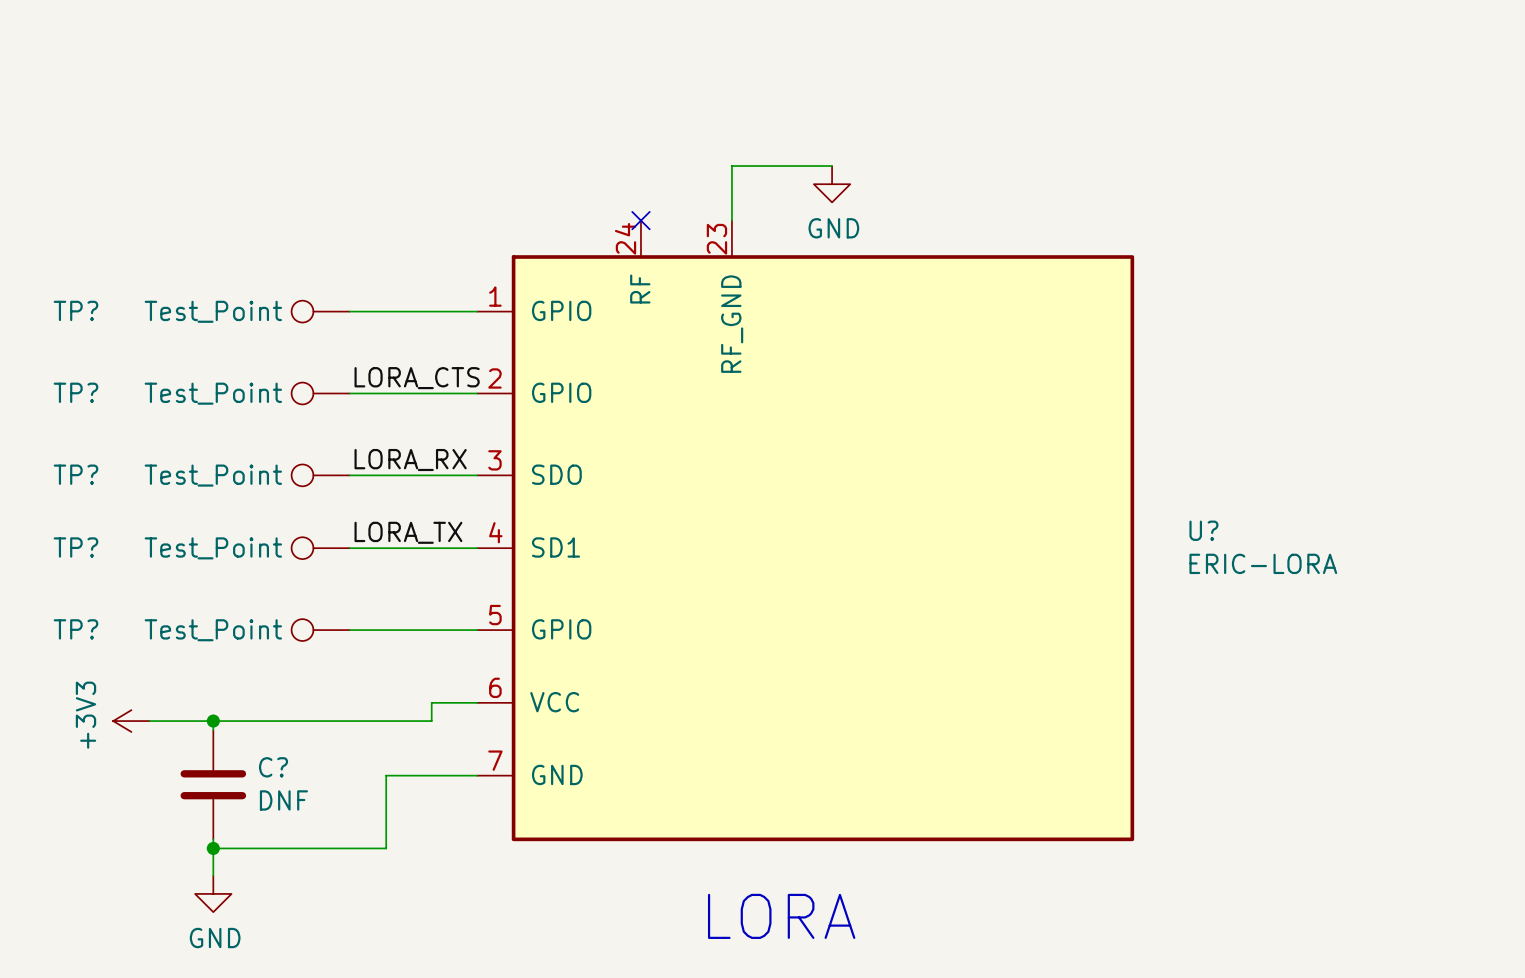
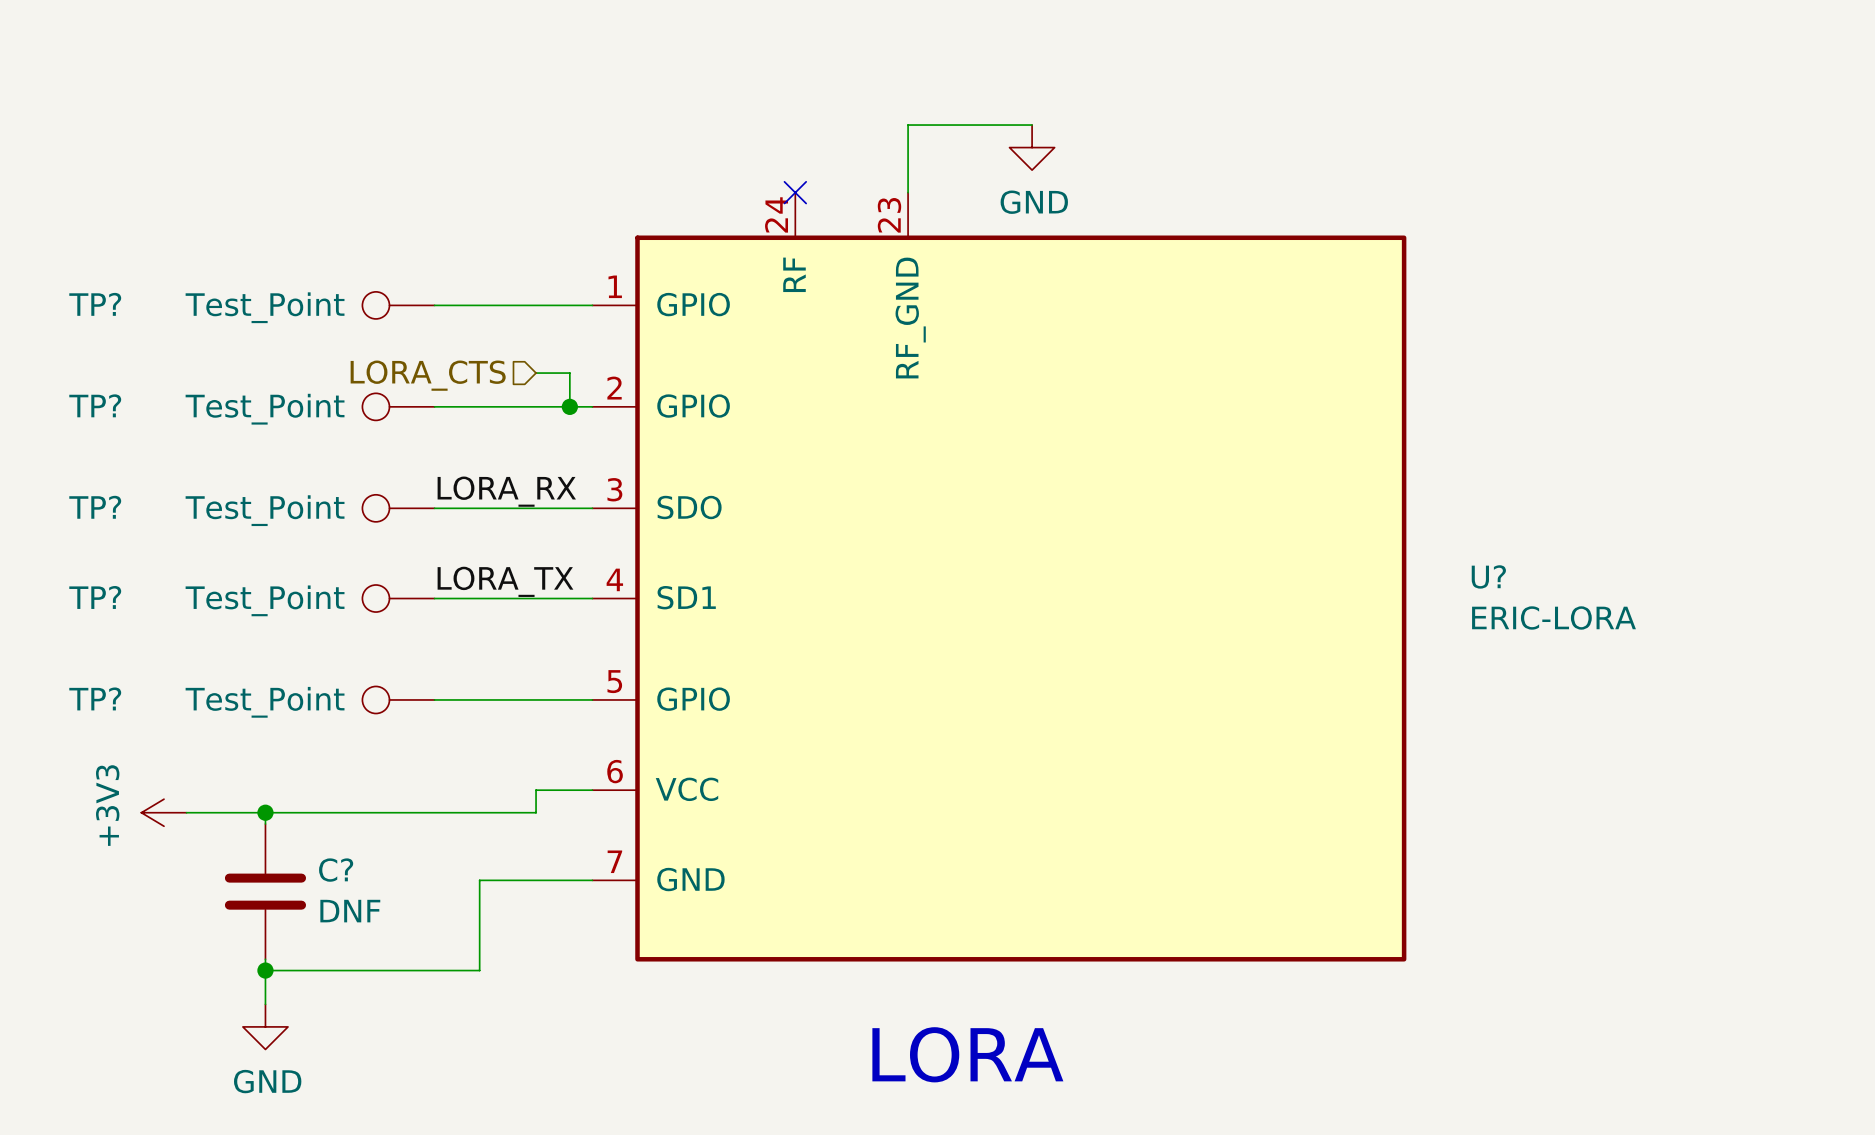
hierarchical label: none -> LORA_CTS (428, 375)
wire: none -> (536, 373) (569, 373) (569, 406)
label: LORA_CTS (417, 378) -> none
junction: none -> (569, 406)

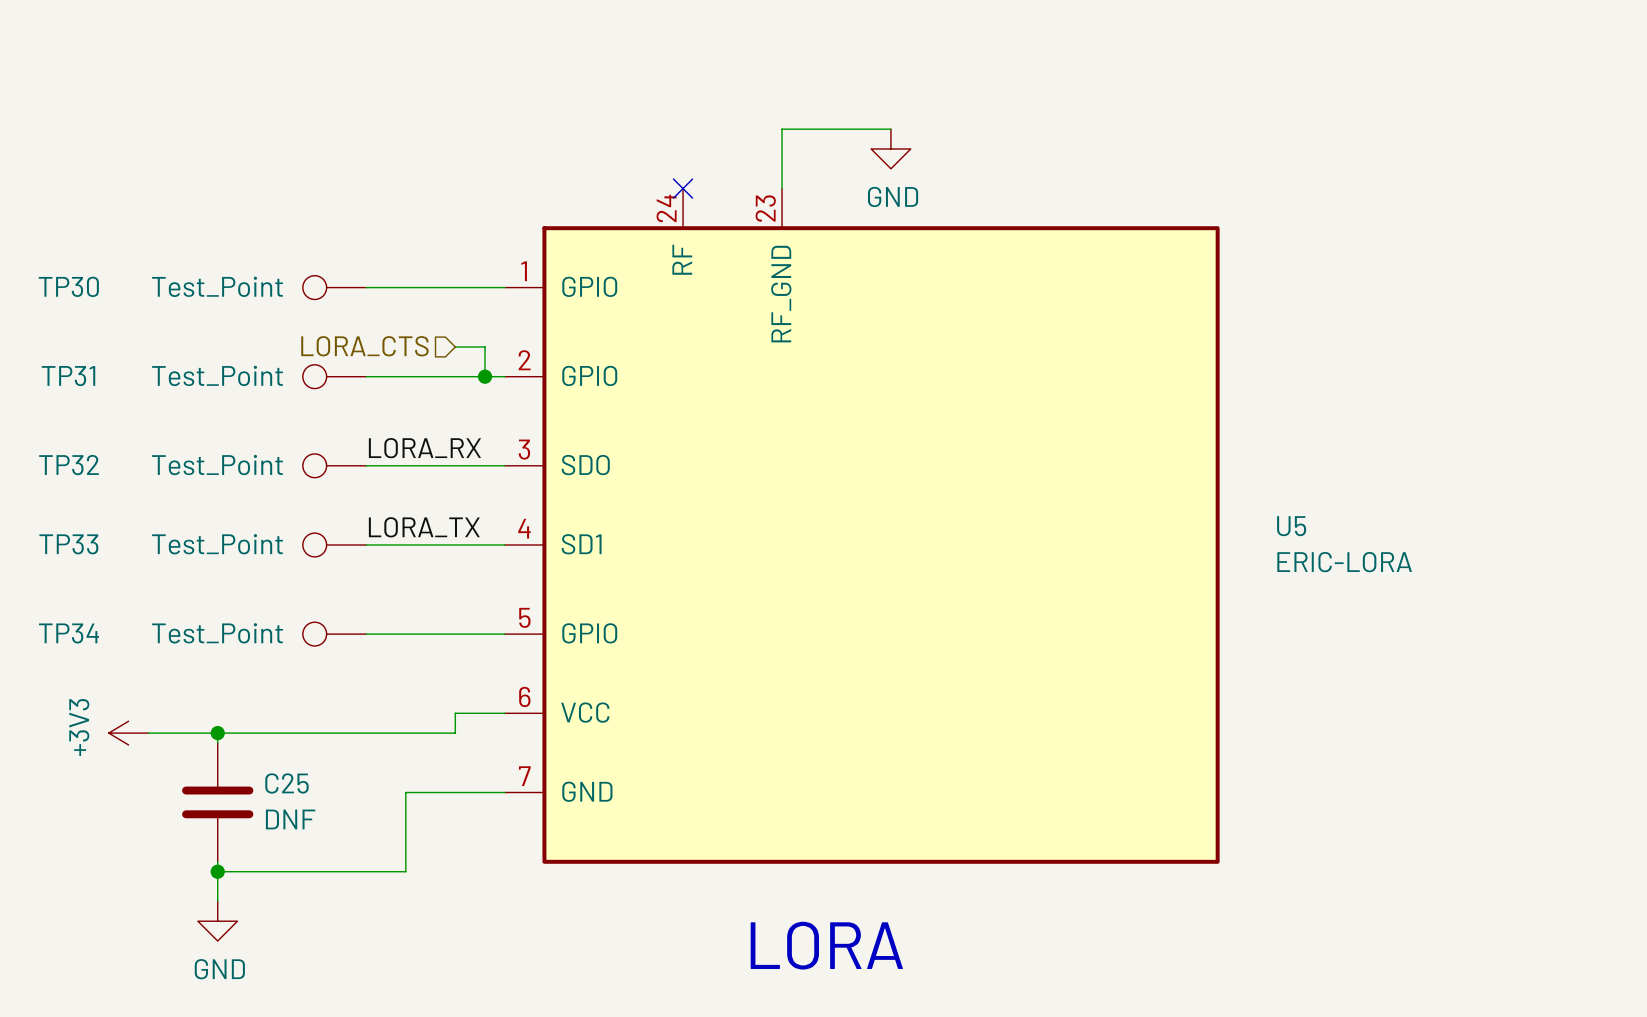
TP? name: TP? (95, 304) -> TP30 (68, 286)
TP? name: TP? (95, 405) -> TP31 (68, 376)
TP? name: TP? (95, 507) -> TP32 (68, 465)
U? name: U? (1488, 576) -> U5 (1291, 526)
TP? name: TP? (95, 597) -> TP33 (68, 544)
TP? name: TP? (95, 698) -> TP34 (68, 633)
C? name: C? (336, 870) -> C25 (287, 783)

